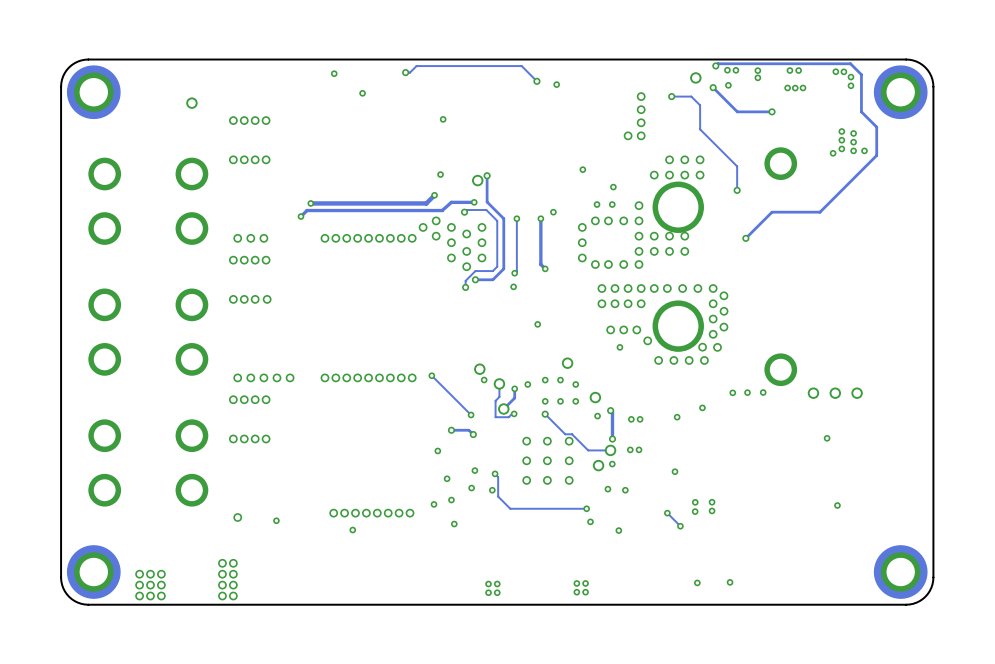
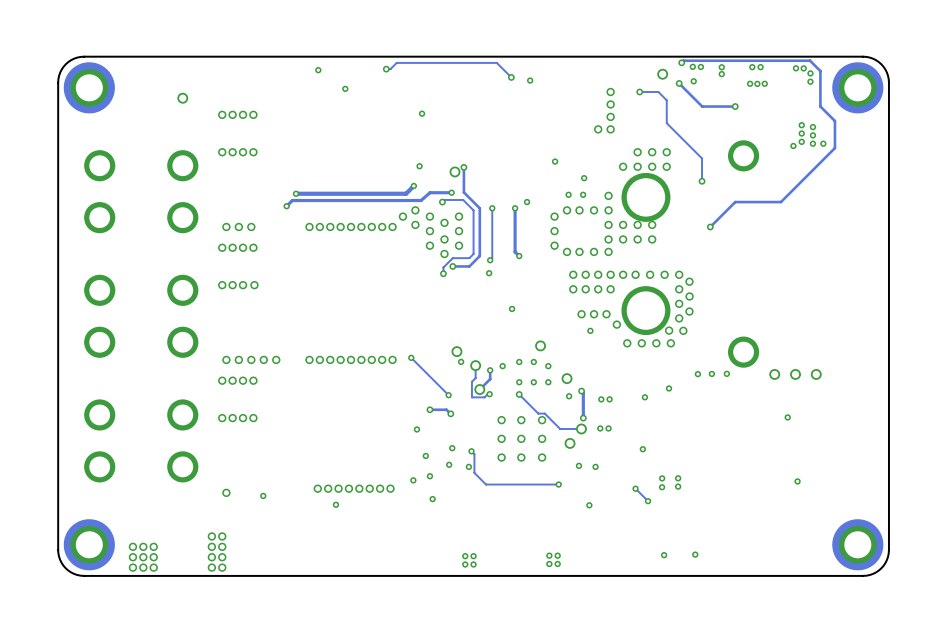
via: (612, 464) -> none
via: (590, 521) -> none

